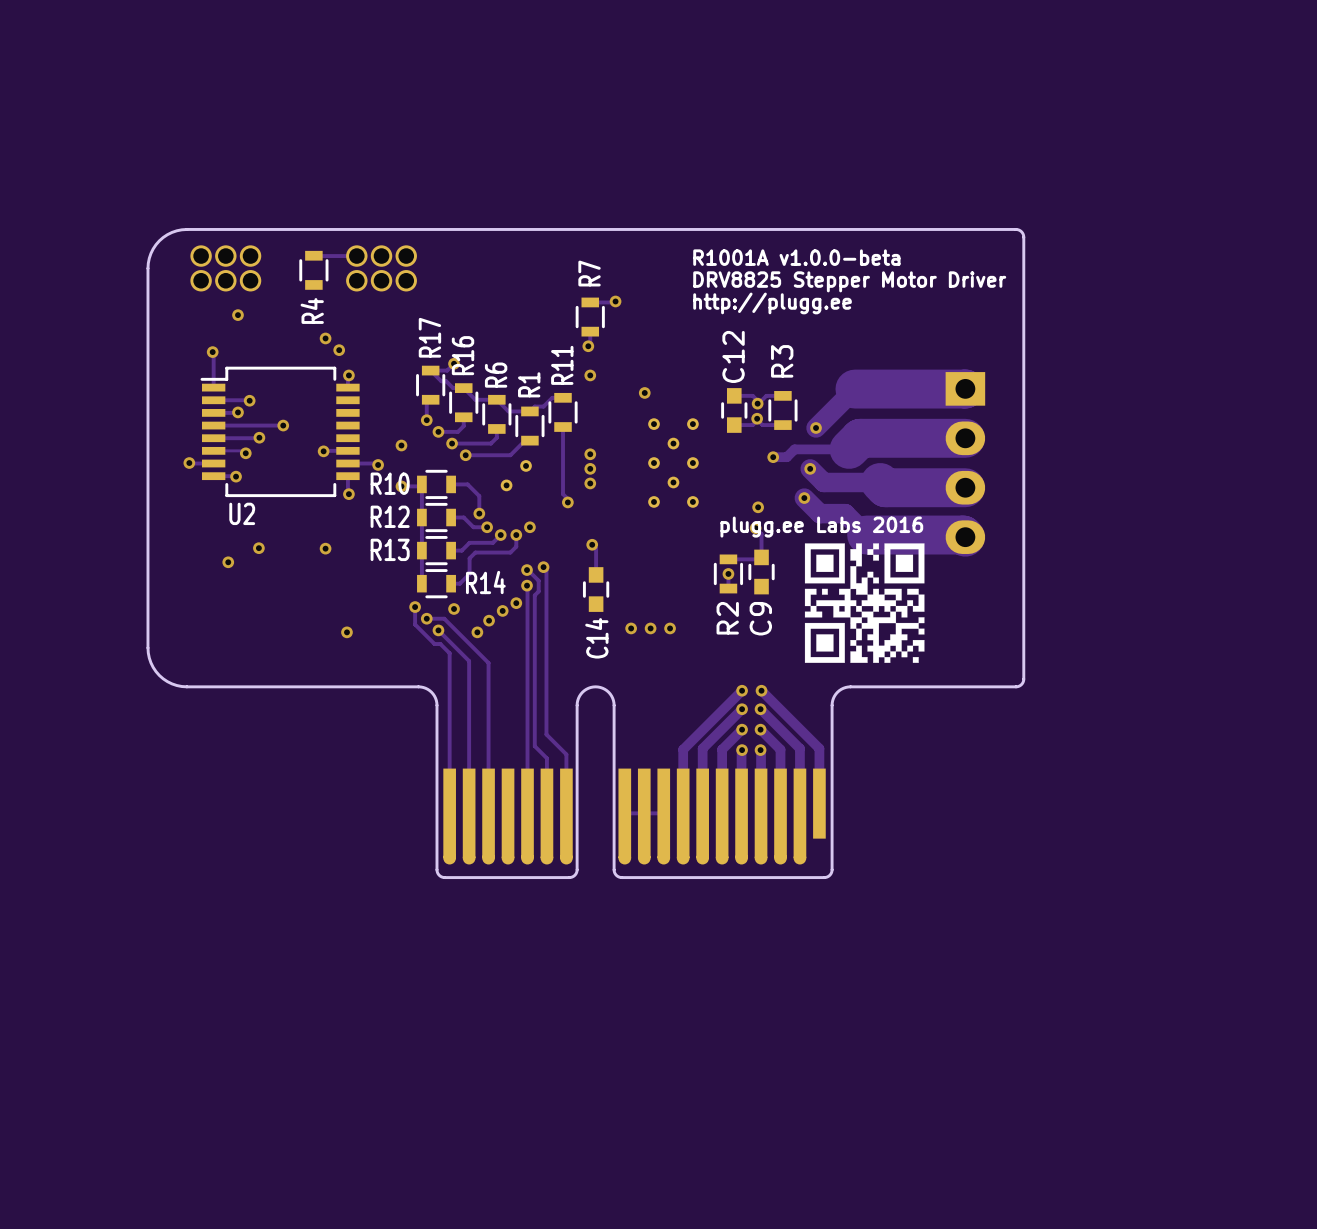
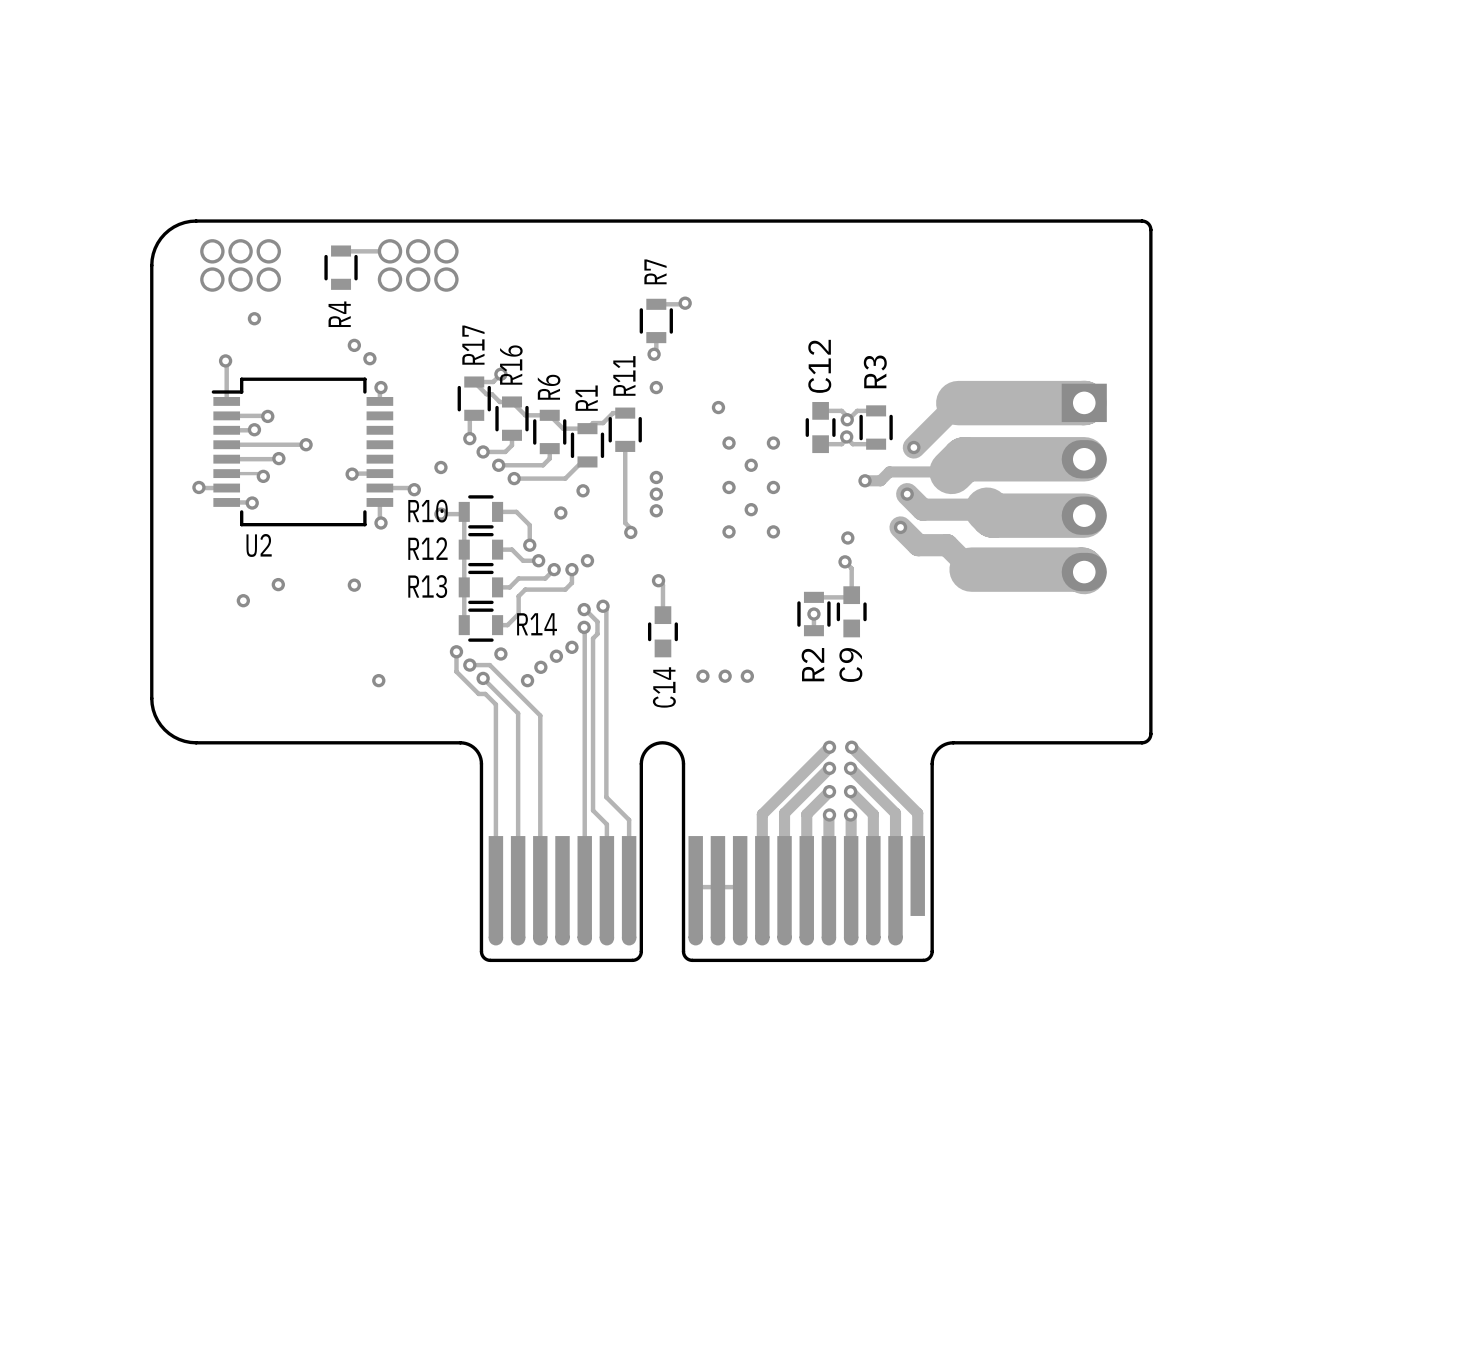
text: R1001A v1.0.0-beta (796, 257) -> none
text: DRV8825 Stepper Motor Driver (849, 281) -> none
text: http://plugg.ee (772, 303) -> none
text: plugg.ee Labs 2016 (821, 527) -> none
drawing: [804, 543, 925, 663] -> none

